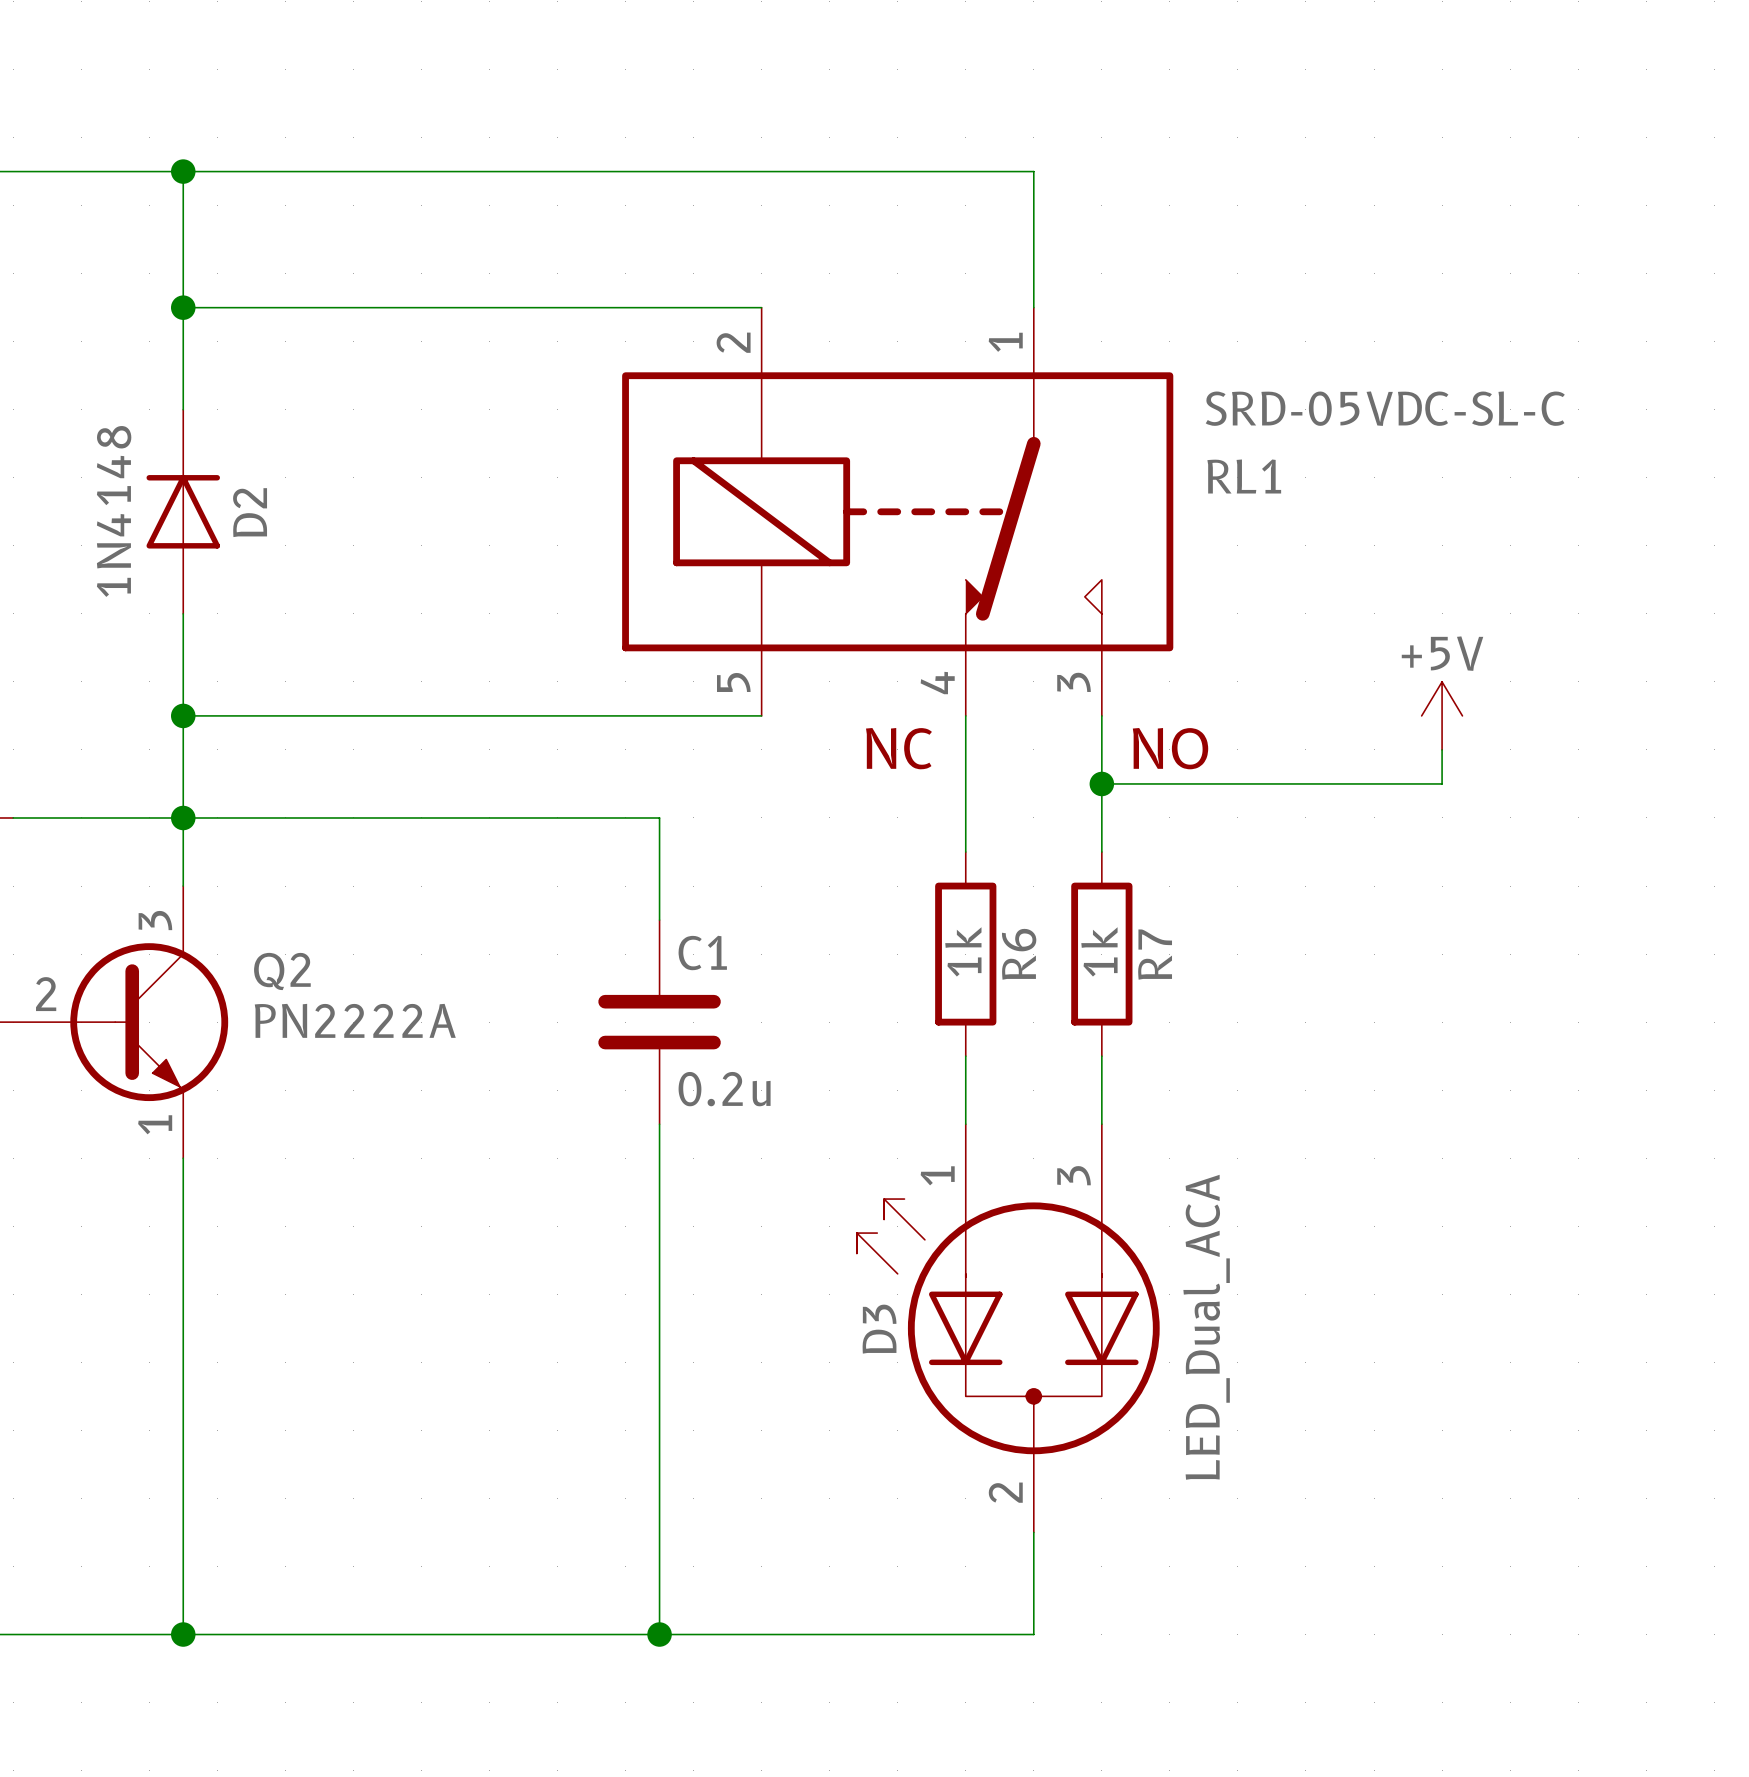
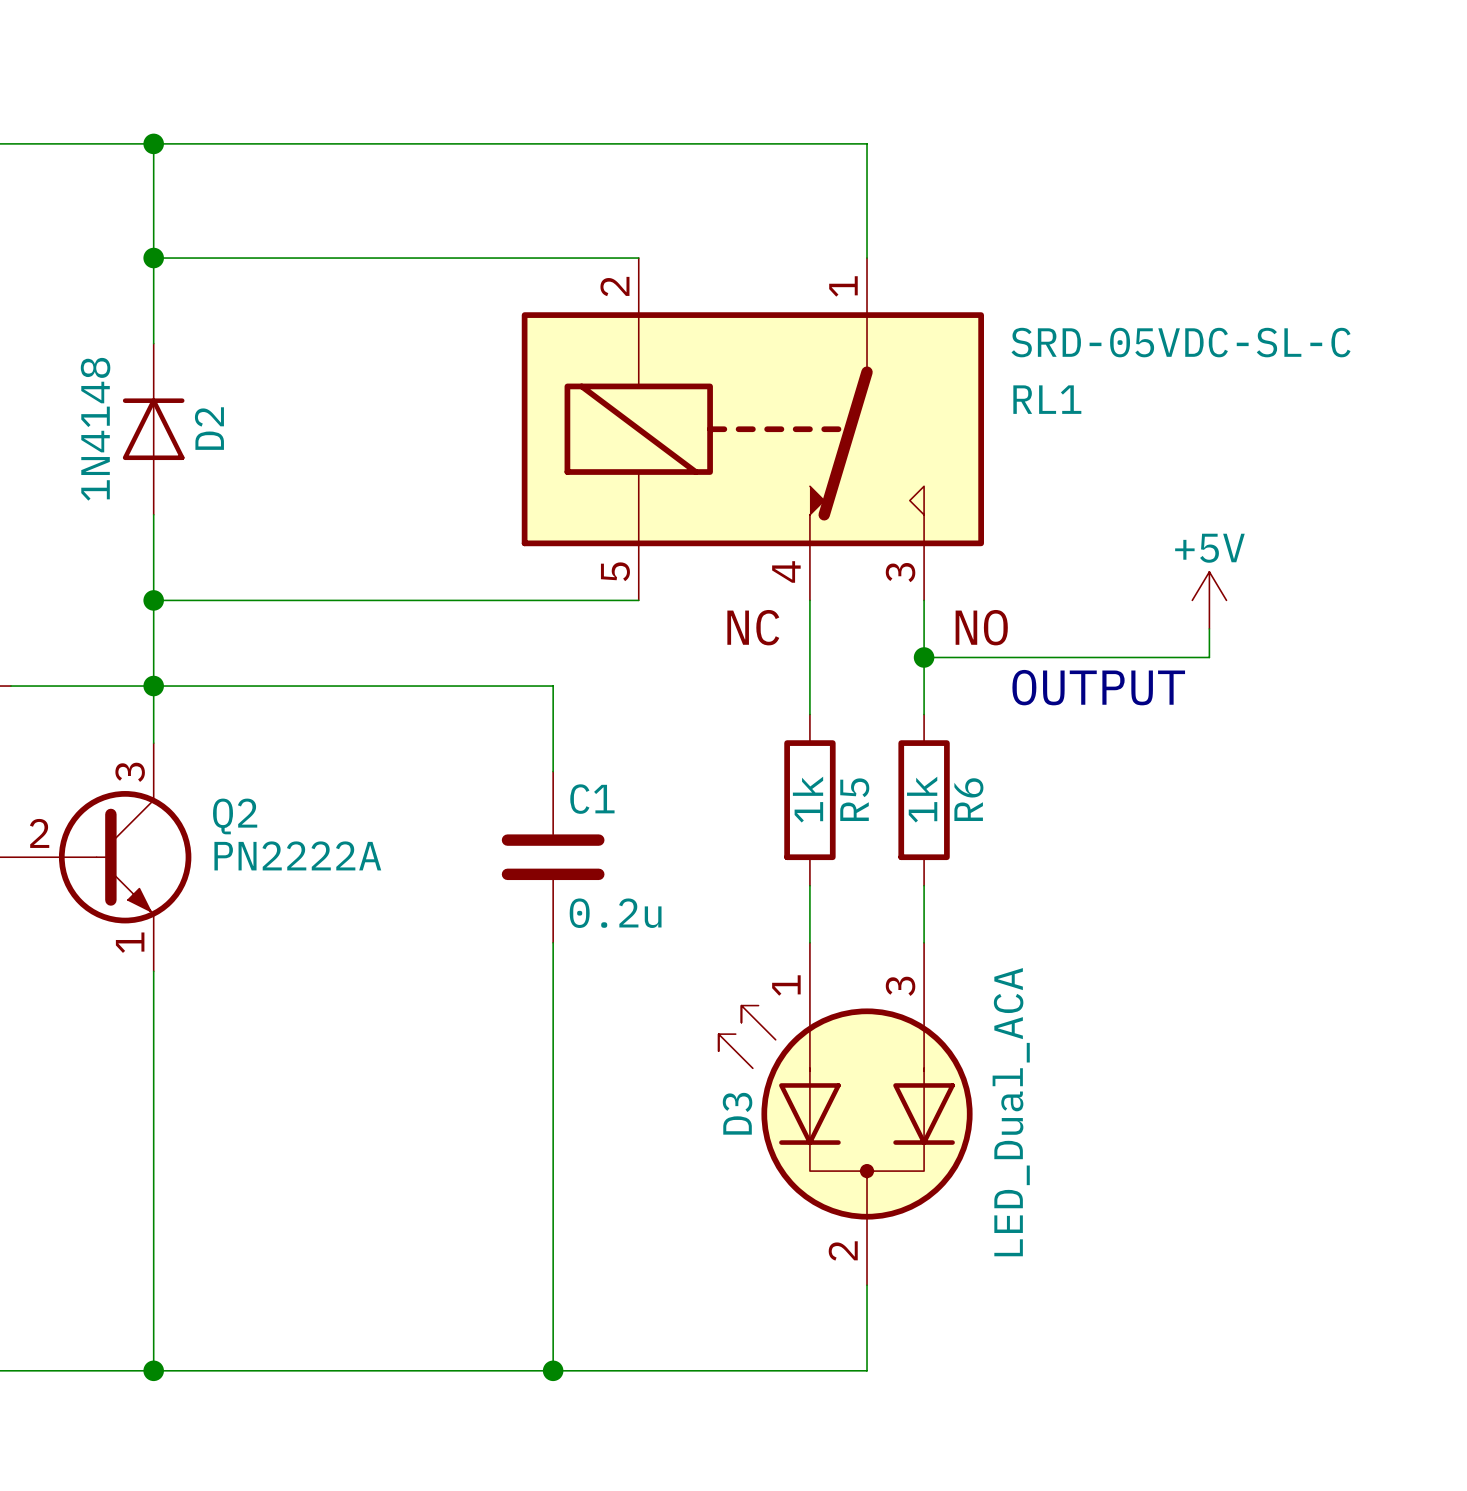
text: none -> OUTPUT (1098, 687)
R6 name: R6 (1019, 954) -> R5 (854, 799)
R7 name: R7 (1155, 954) -> R6 (968, 799)

